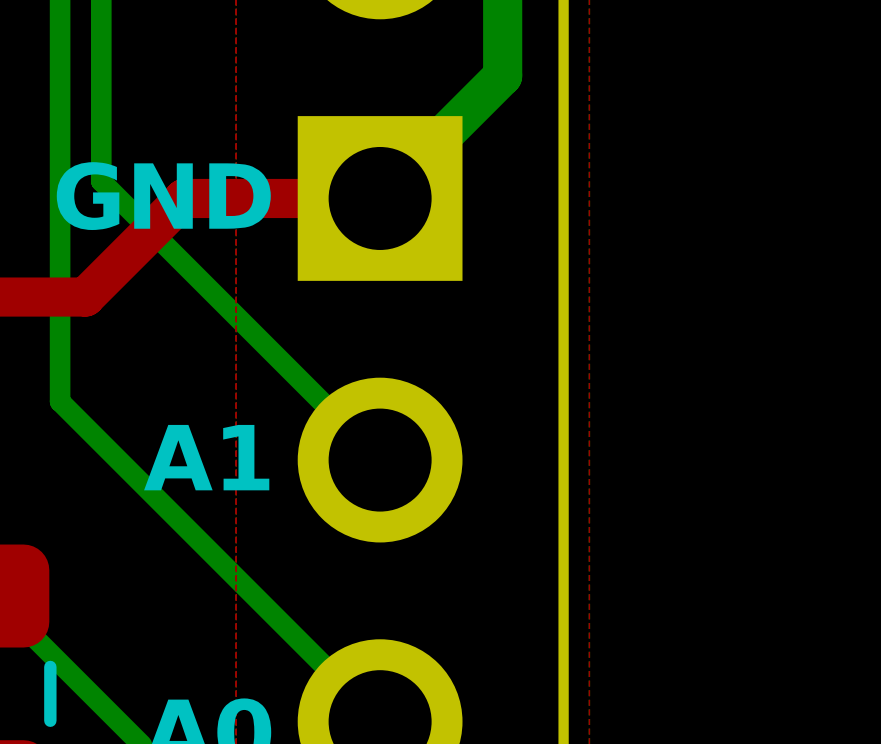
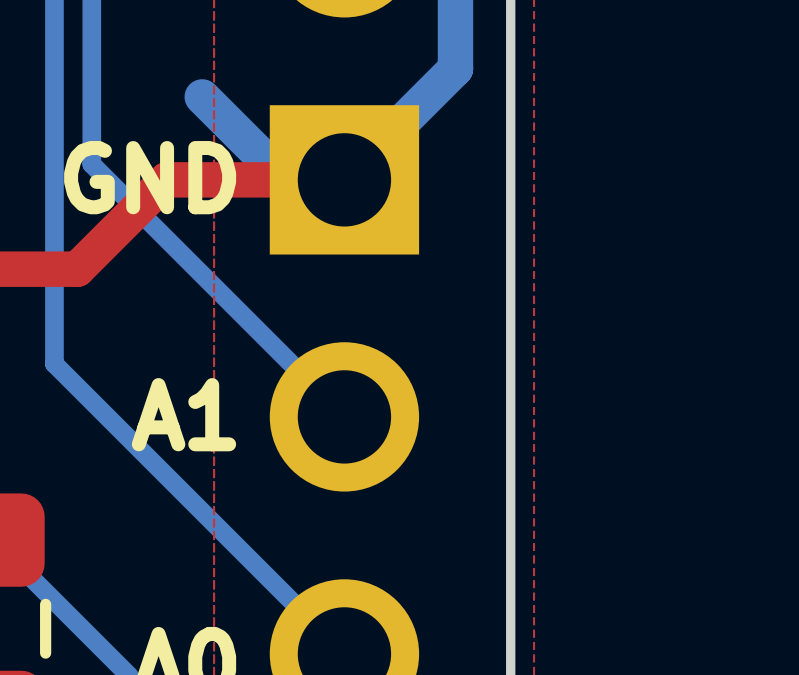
bottom track: none -> (202, 96) (285, 179) (344, 179)

